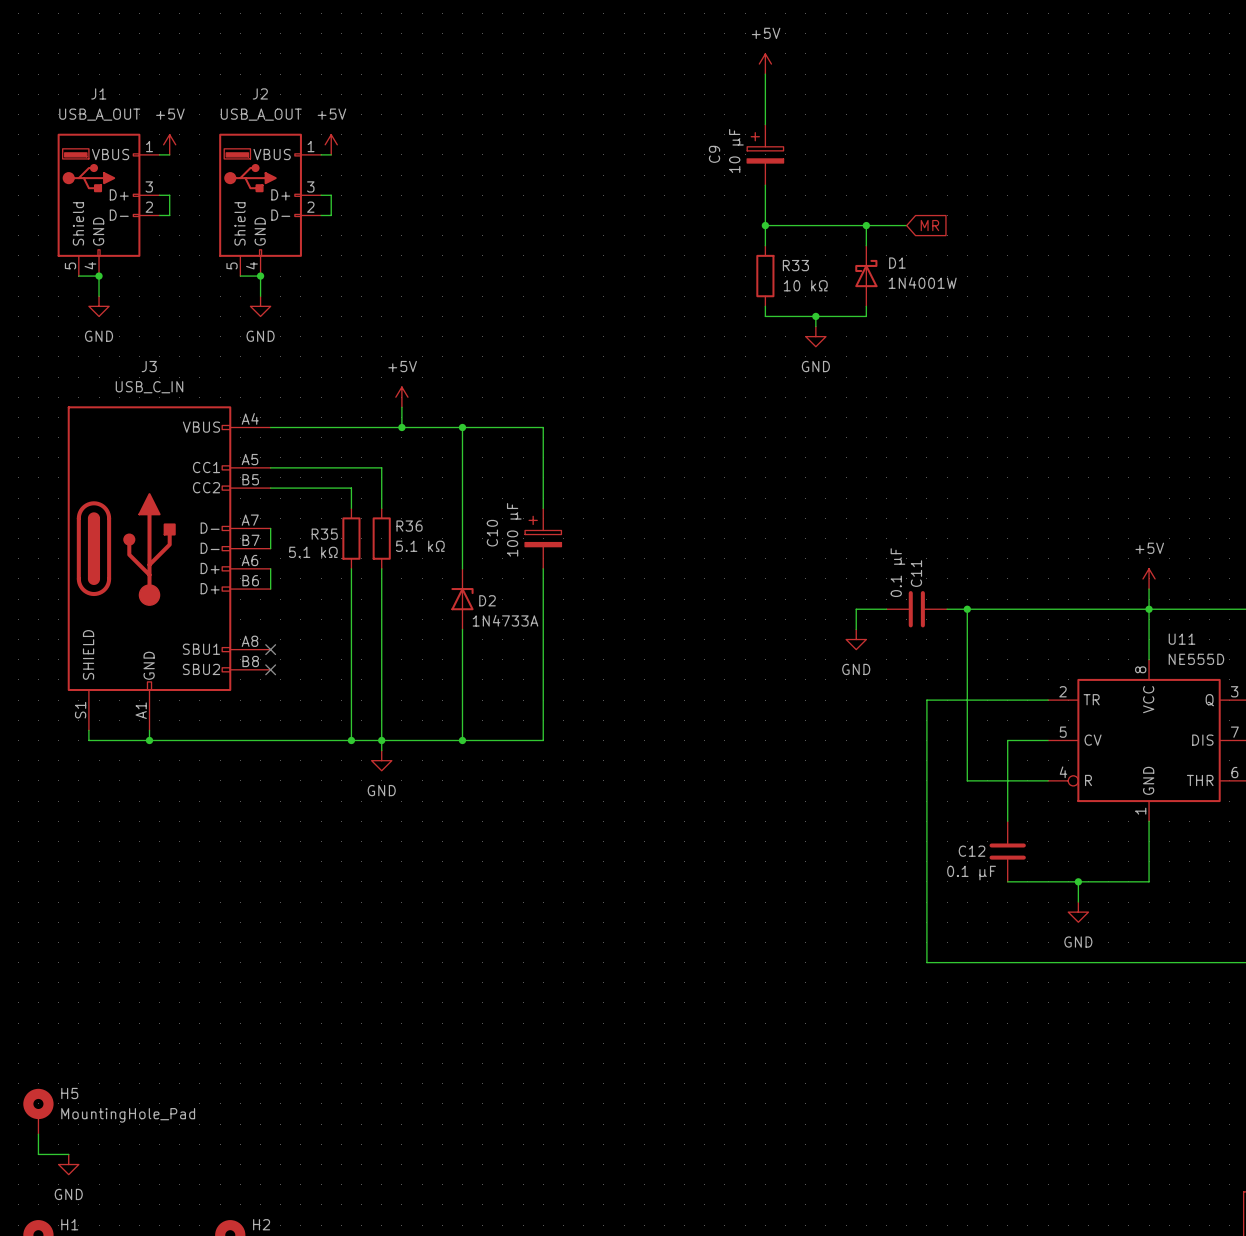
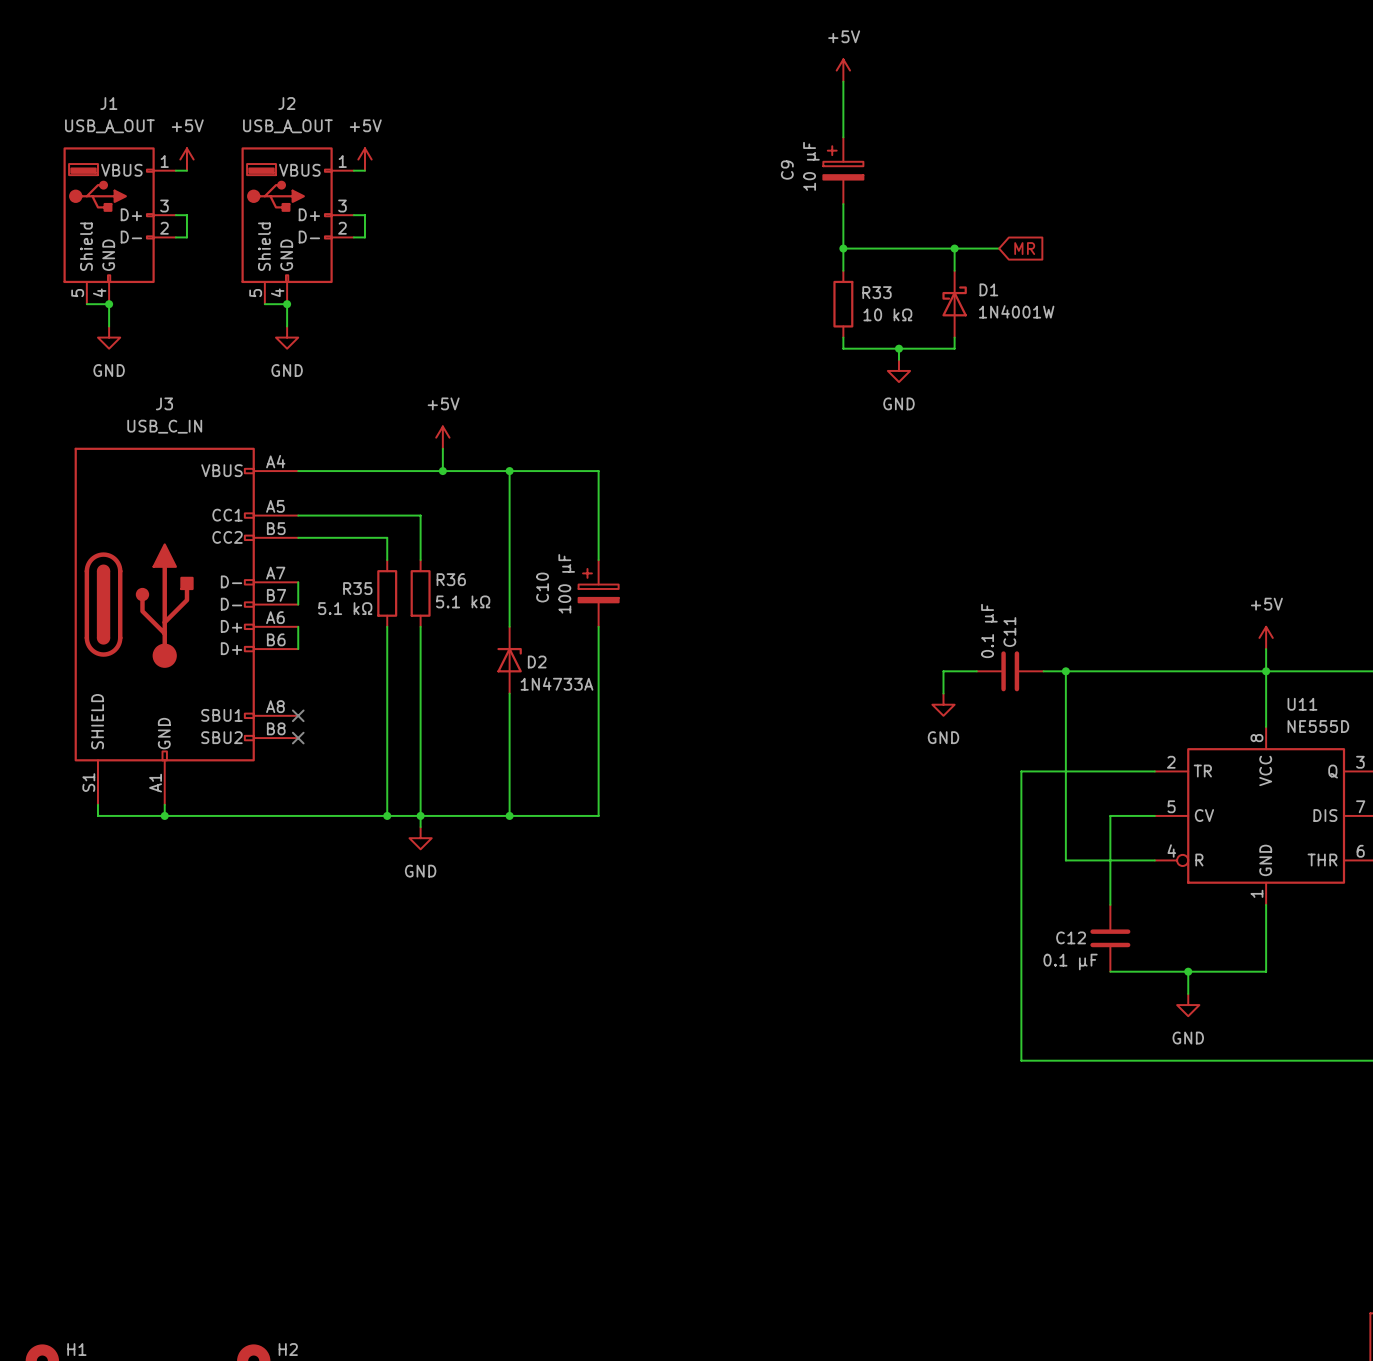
H5: MountingHole_Pad (38, 1111) -> none
wire: (38, 1134) (38, 1154) (68, 1154) -> none
power symbol: GND (68, 1164) -> none

